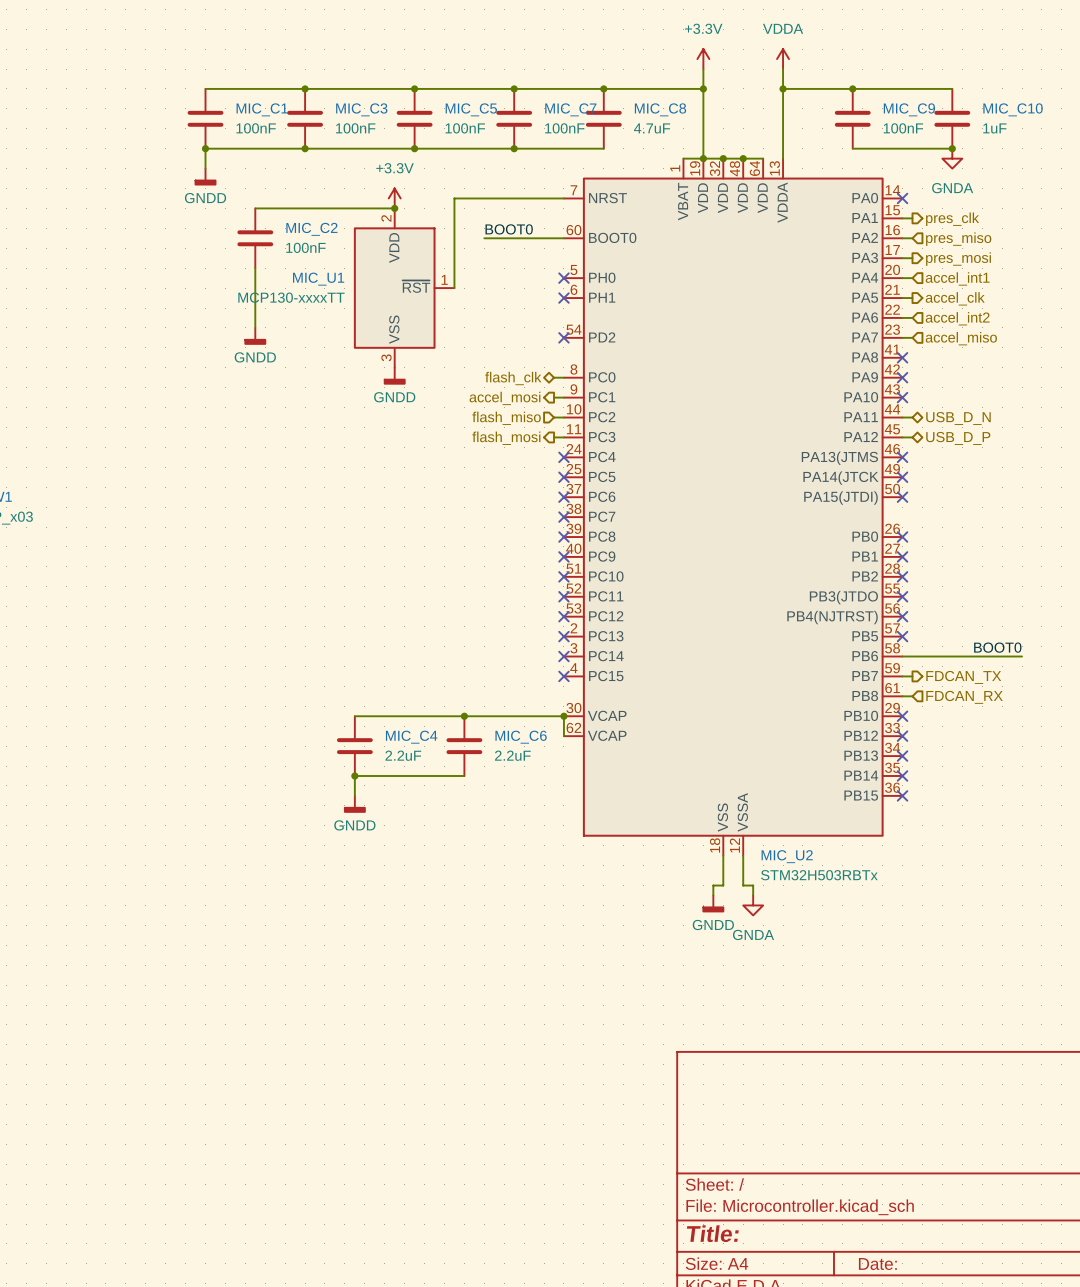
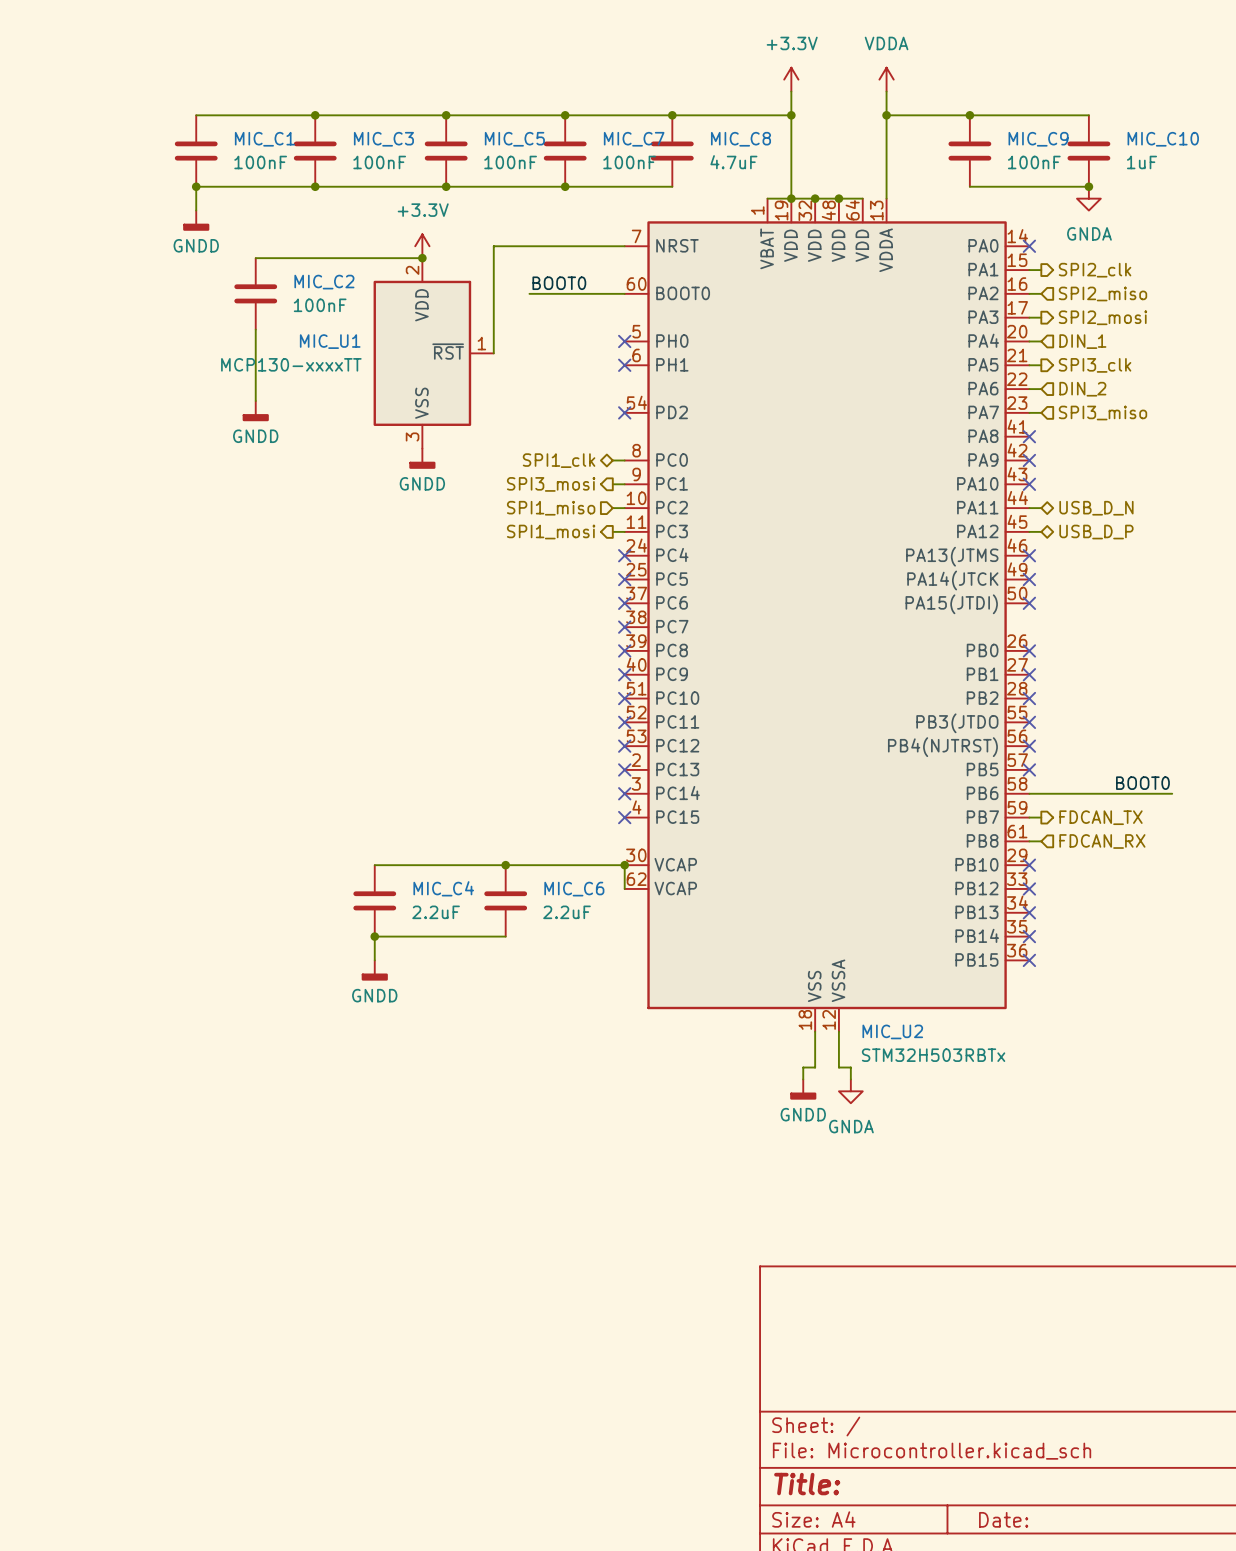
hierarchical label: pres_clk (952, 219) -> SPI2_clk (1095, 270)
hierarchical label: pres_miso (958, 239) -> SPI2_miso (1102, 293)
hierarchical label: pres_mosi (958, 259) -> SPI2_mosi (1102, 317)
hierarchical label: accel_int1 (957, 278) -> DIN_1 (1082, 341)
hierarchical label: accel_clk (955, 298) -> SPI3_clk (1095, 365)
hierarchical label: accel_int2 (957, 318) -> DIN_2 (1082, 389)
hierarchical label: accel_miso (961, 338) -> SPI3_miso (1102, 413)
hierarchical label: flash_clk (513, 378) -> SPI1_clk (559, 460)
hierarchical label: accel_mosi (504, 398) -> SPI3_mosi (551, 484)
hierarchical label: flash_miso (506, 418) -> SPI1_miso (551, 508)
hierarchical label: flash_mosi (506, 438) -> SPI1_mosi (551, 532)

